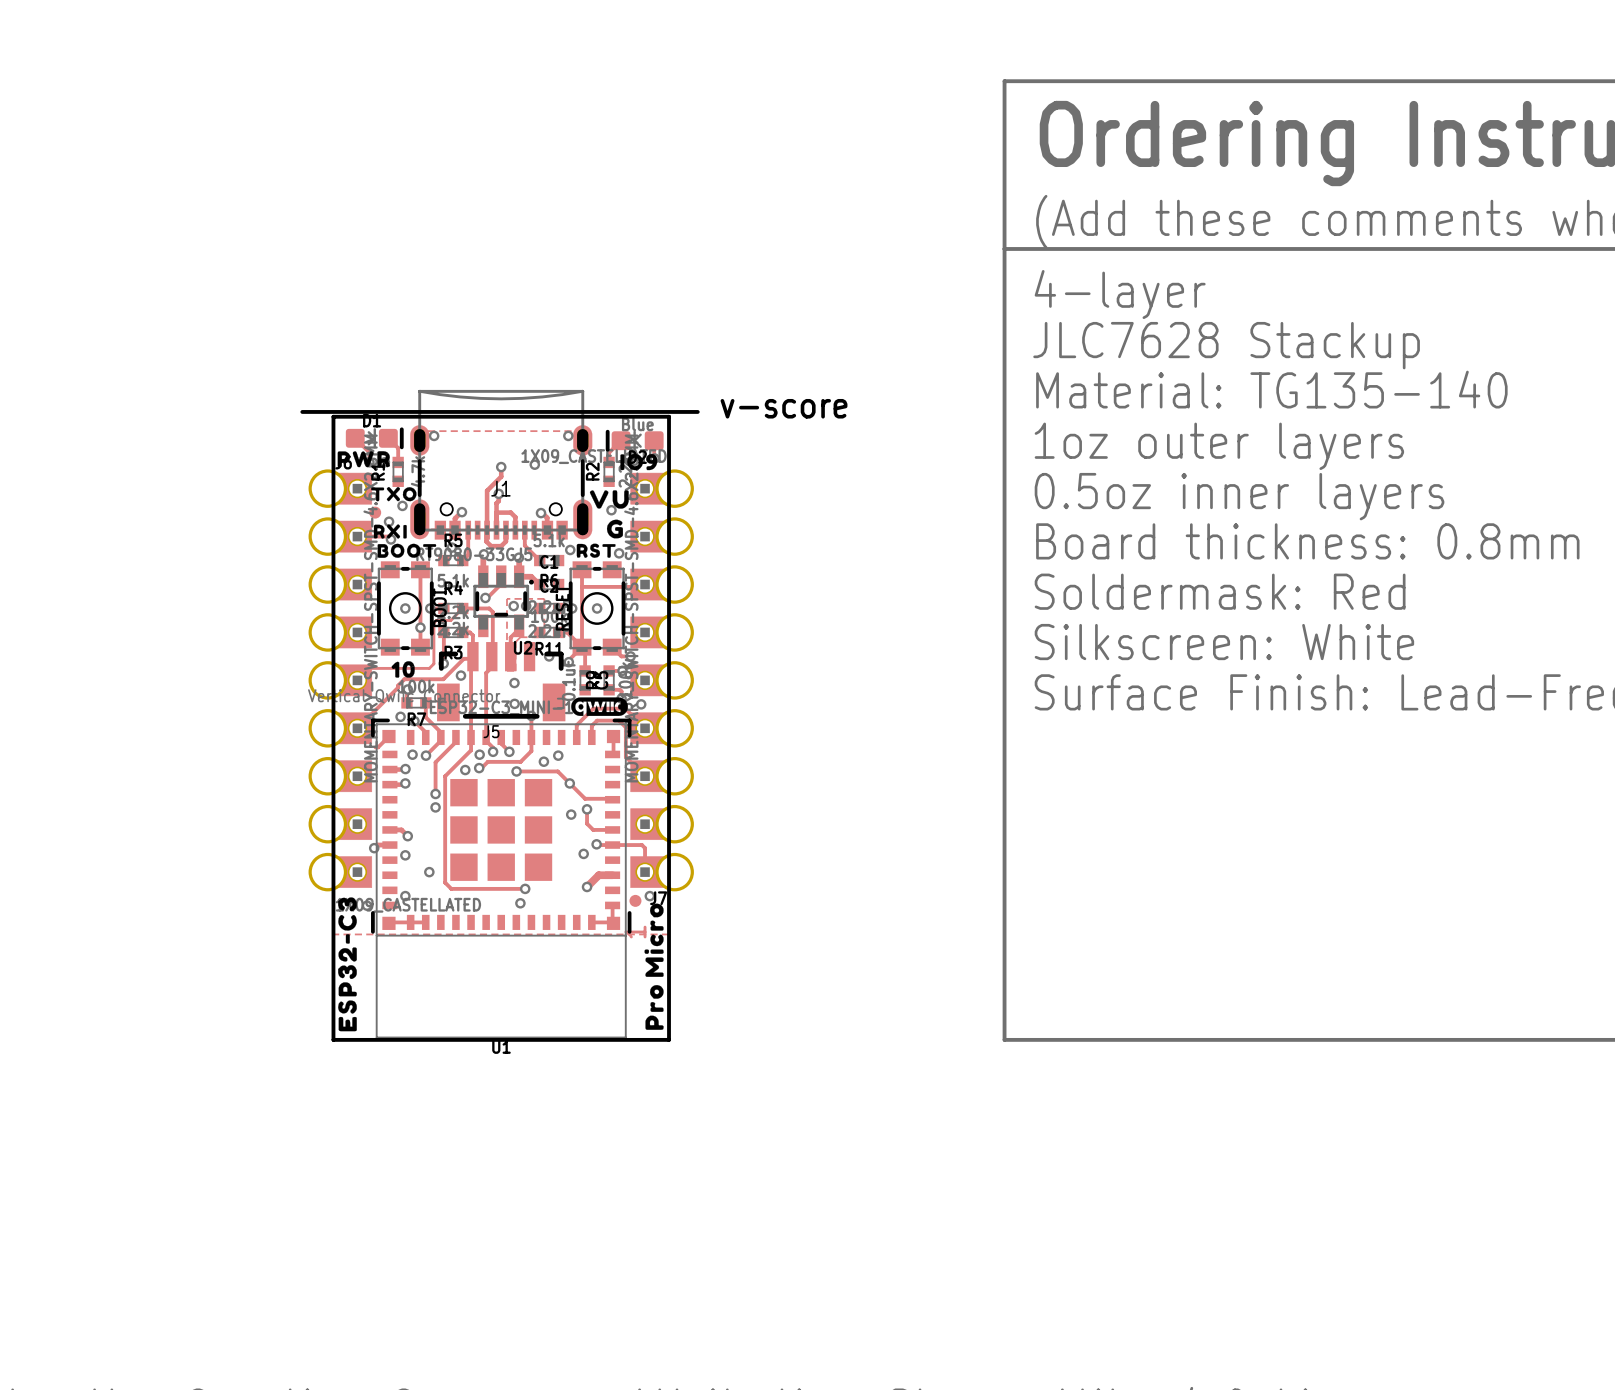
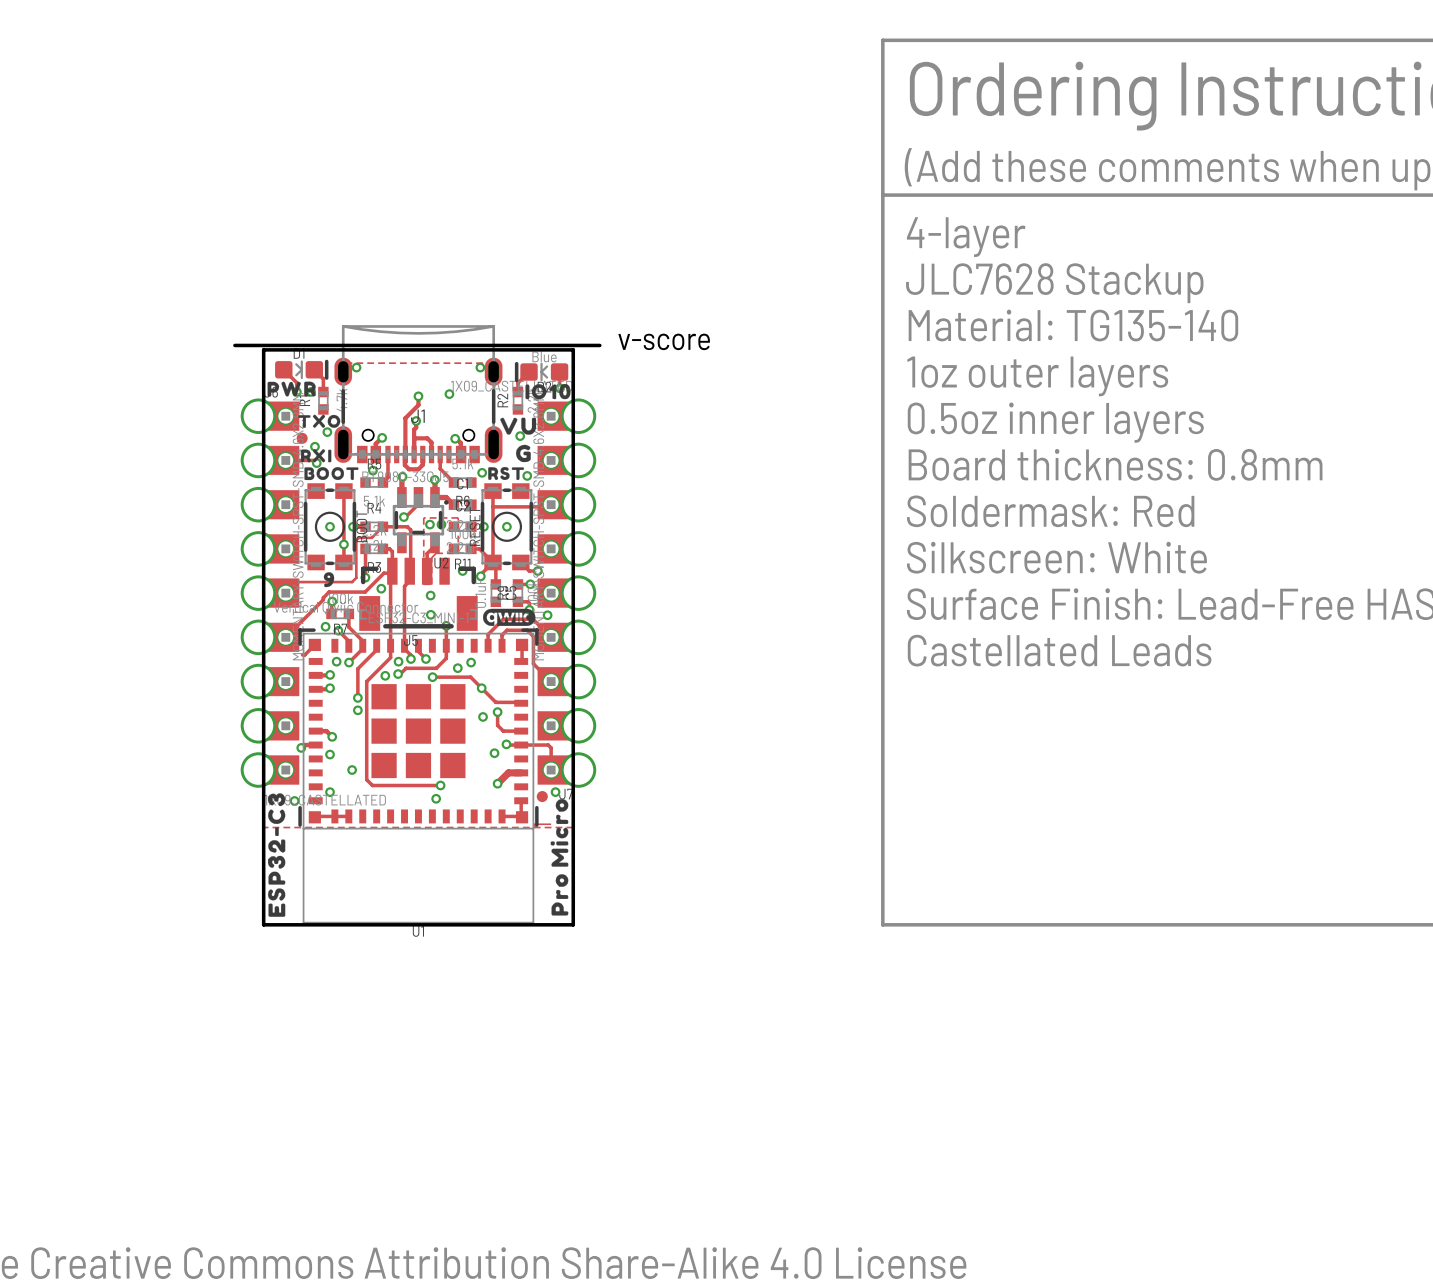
drawing shape: [620, 453, 658, 471] -> [525, 383, 571, 400]
drawing shape: [391, 661, 415, 678] -> [323, 572, 335, 588]
text: none -> Castellated Leads (1059, 650)

